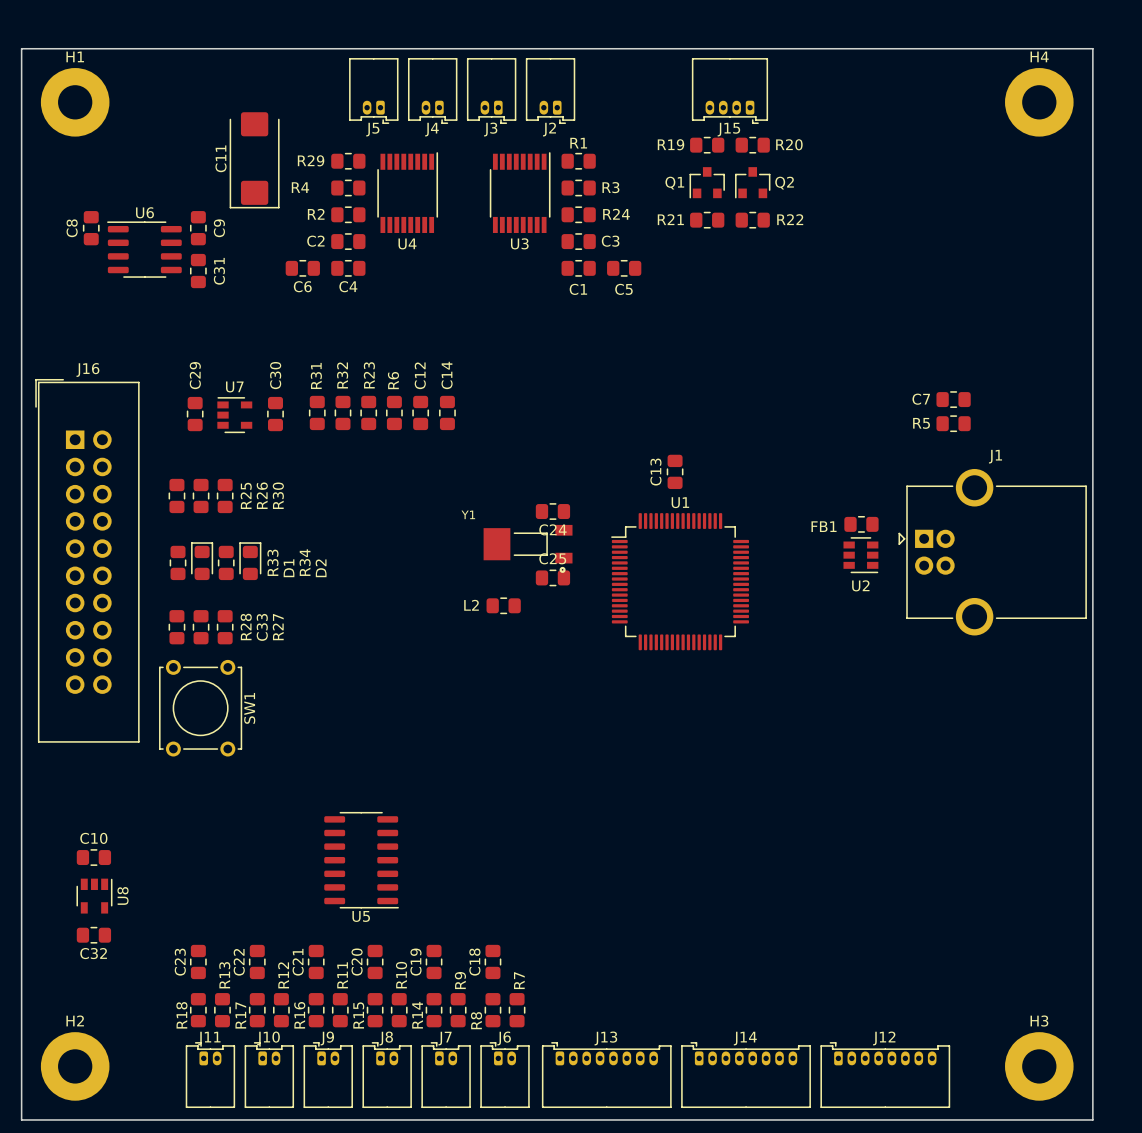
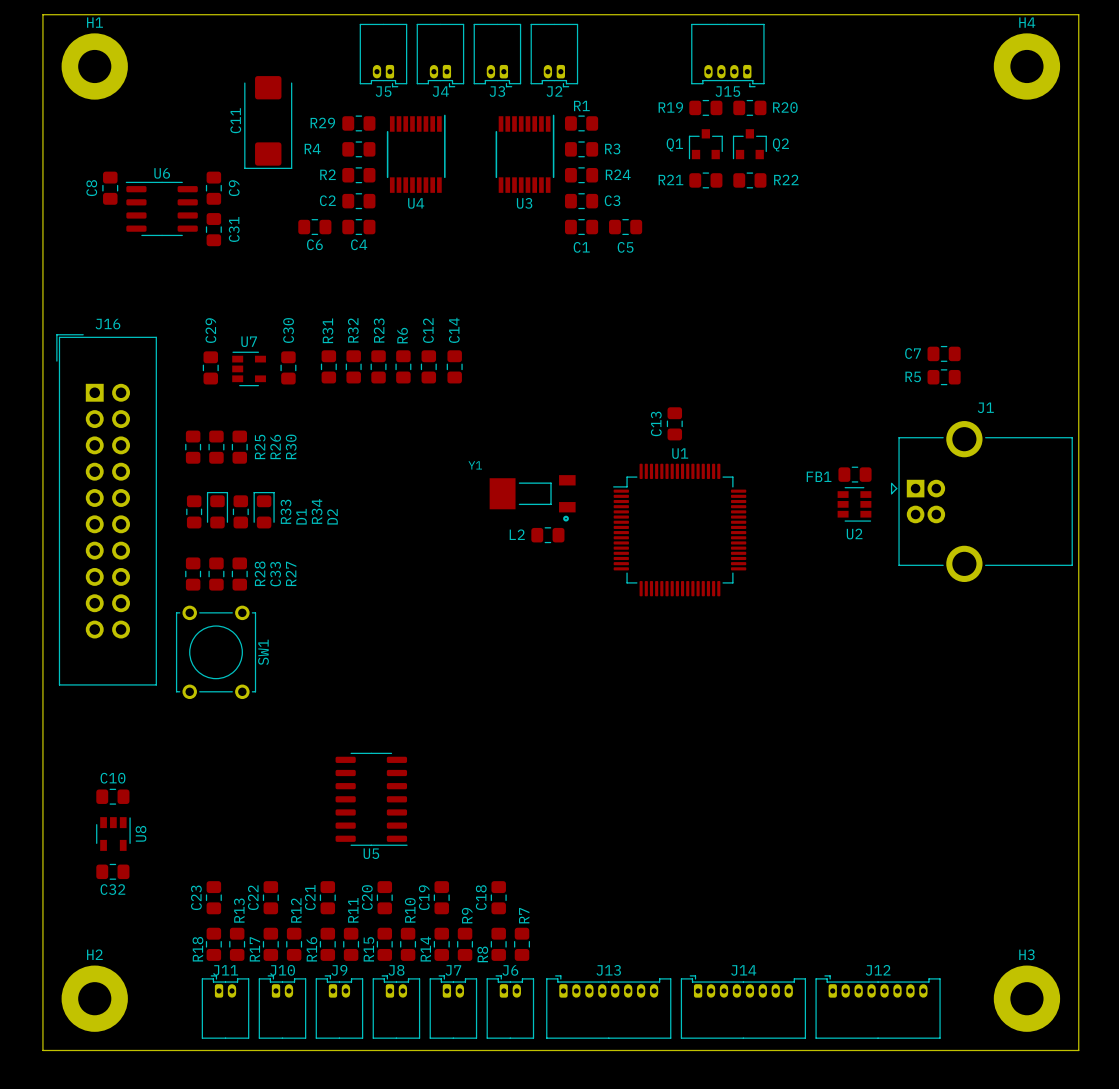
C24: (552, 511) -> none
C25: (552, 577) -> none
L2 position: (503, 605) -> (547, 535)

